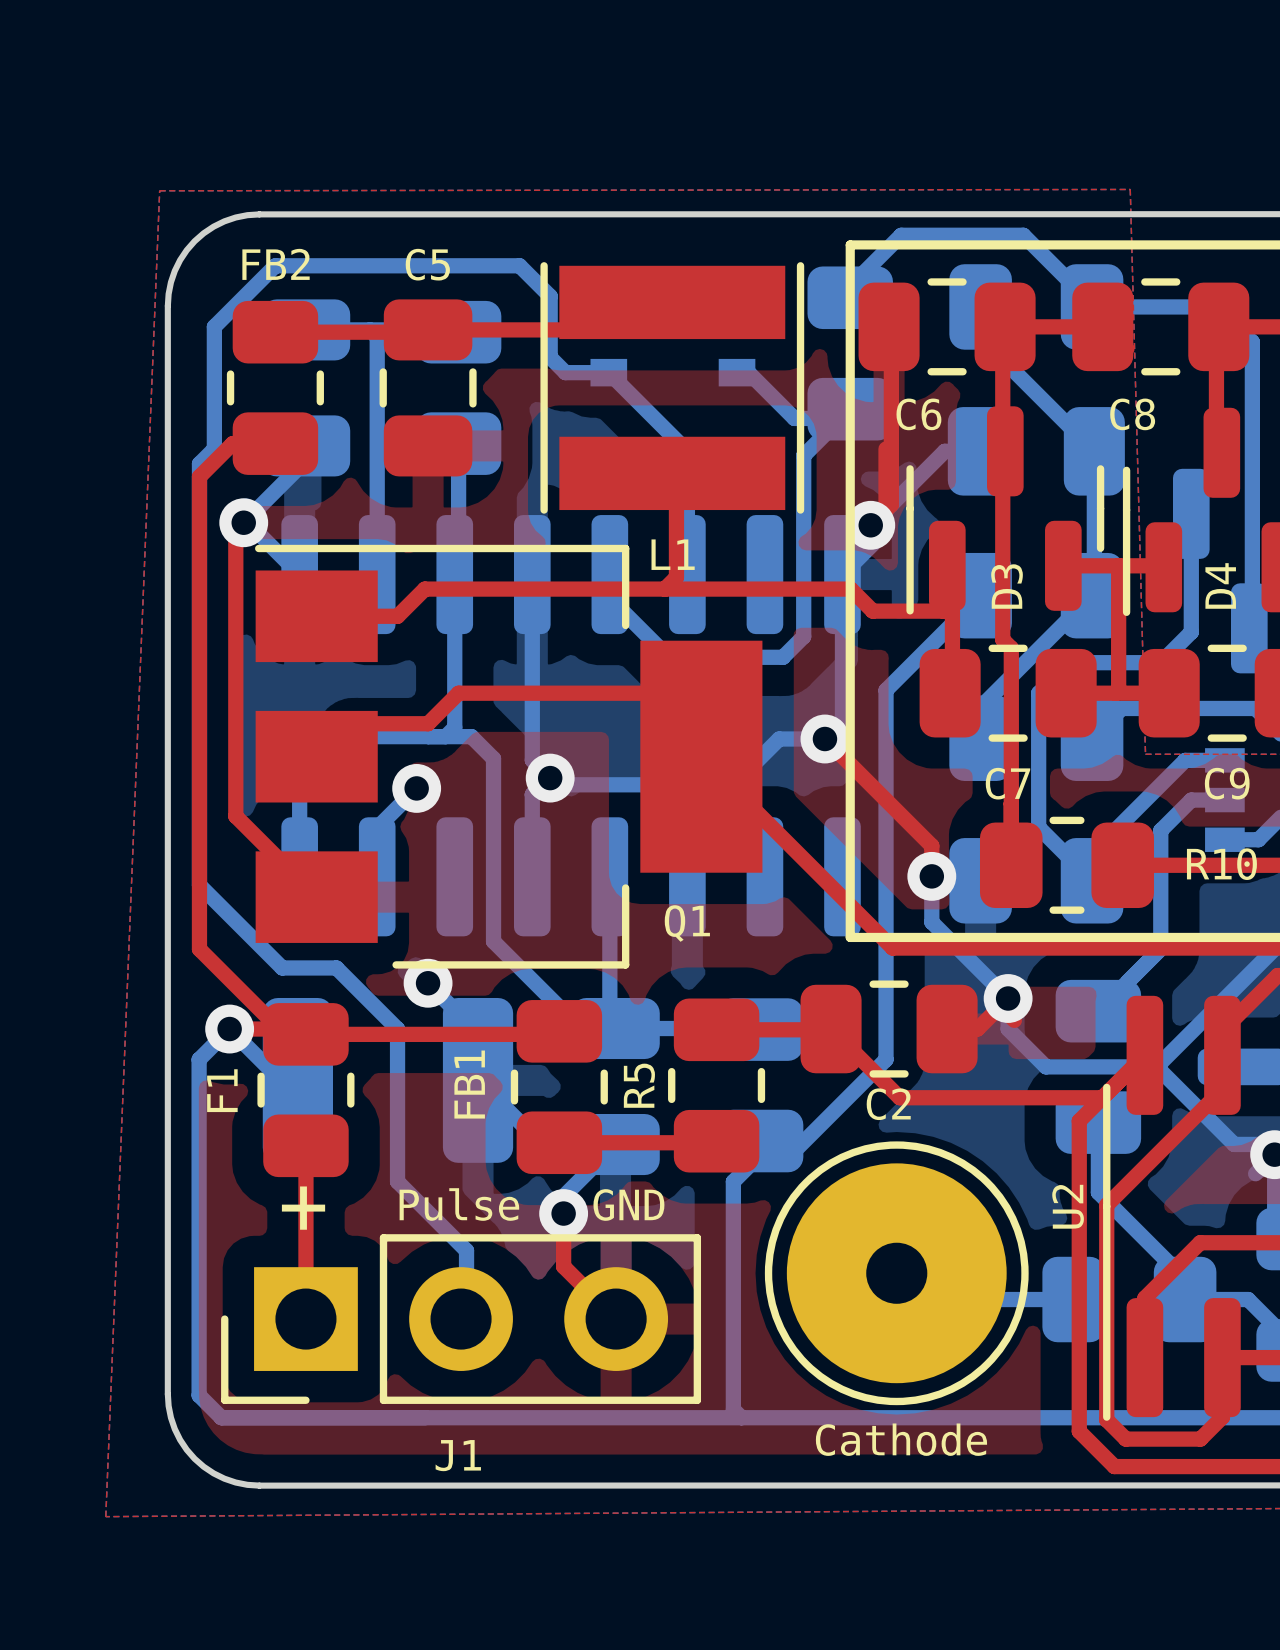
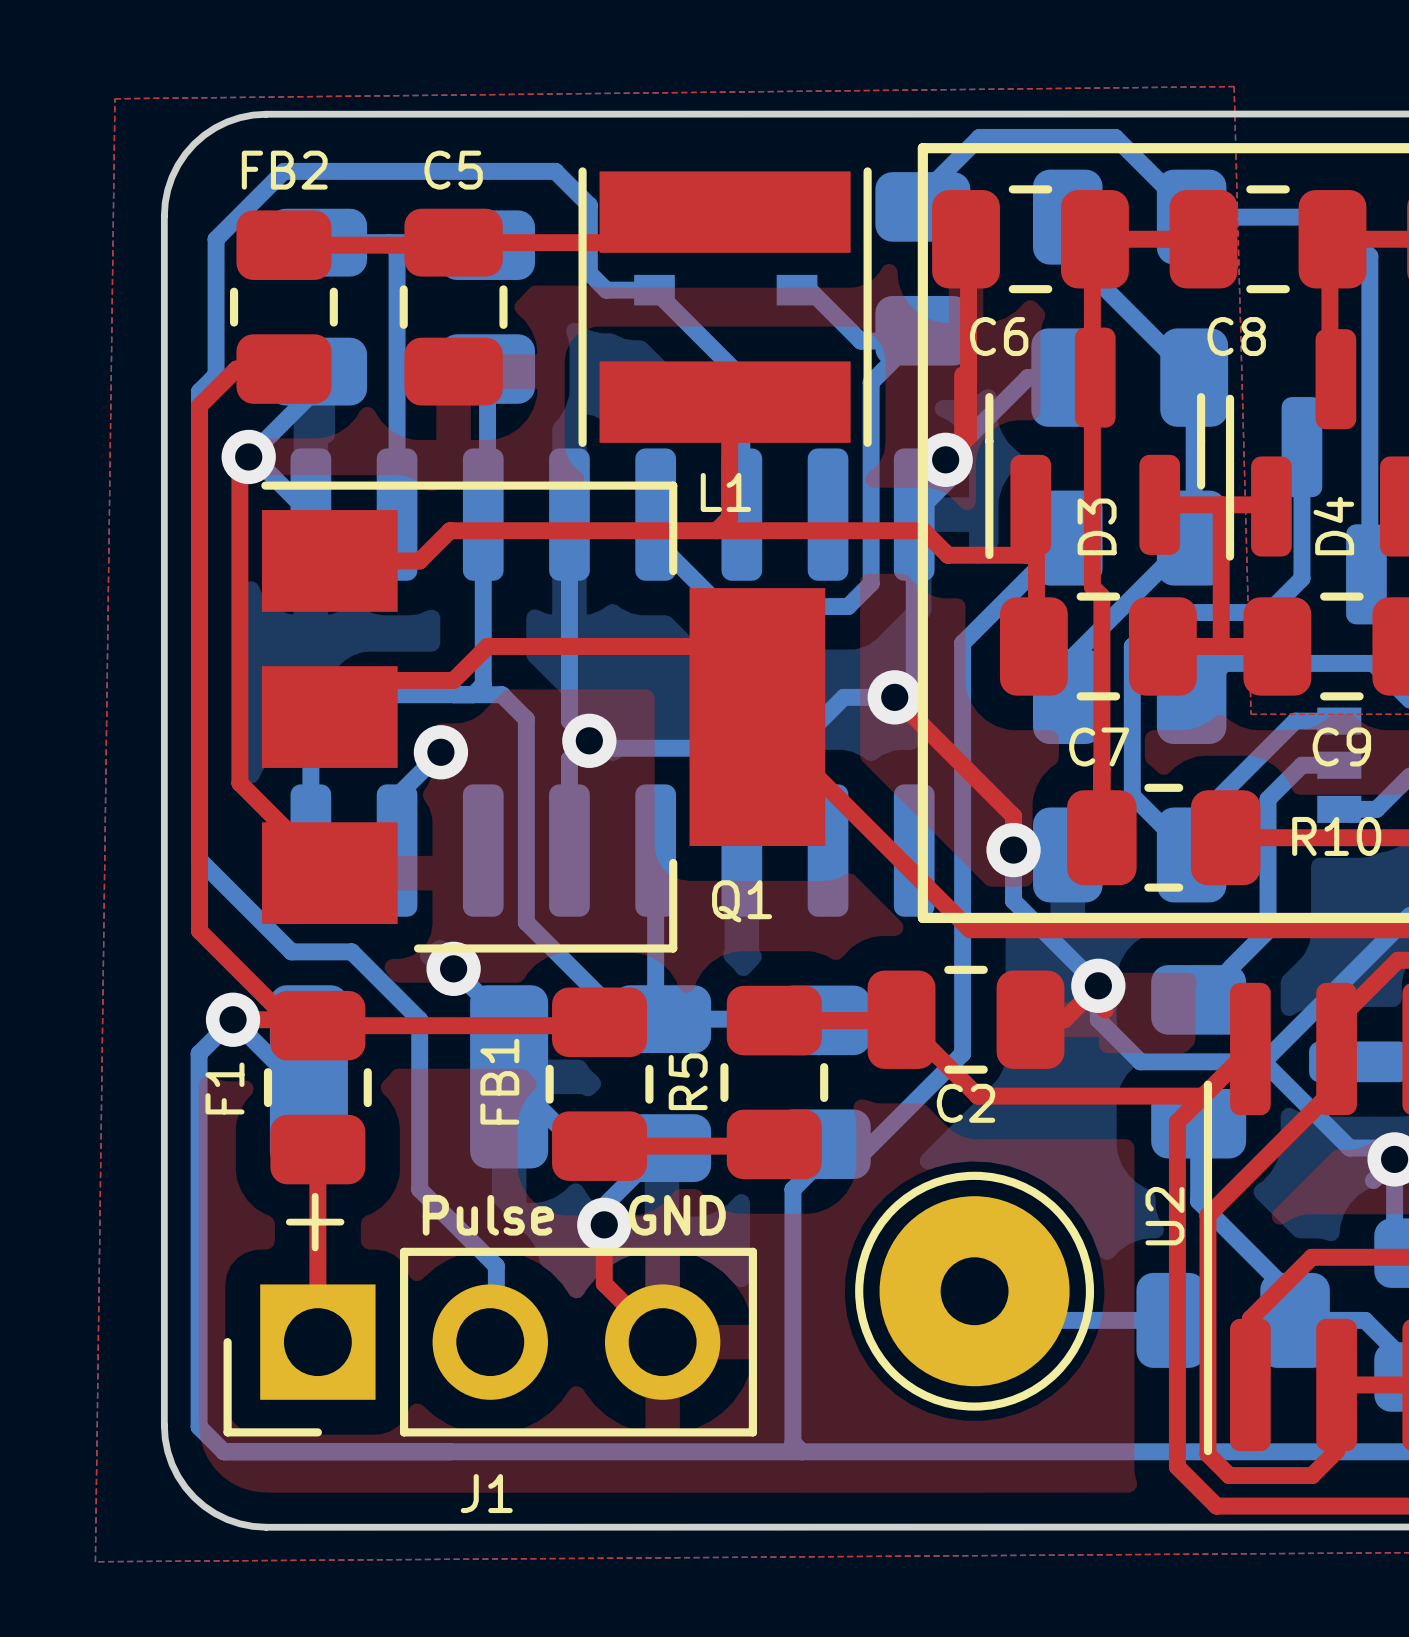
top zone outline: (1130, 189) (159, 190) (105, 1516) -> (1234, 86) (114, 98) (95, 1561)
part footprint: [764, 1141, 1029, 1406] -> [855, 1171, 1095, 1411]
part value: Cathode (901, 1439) -> none

